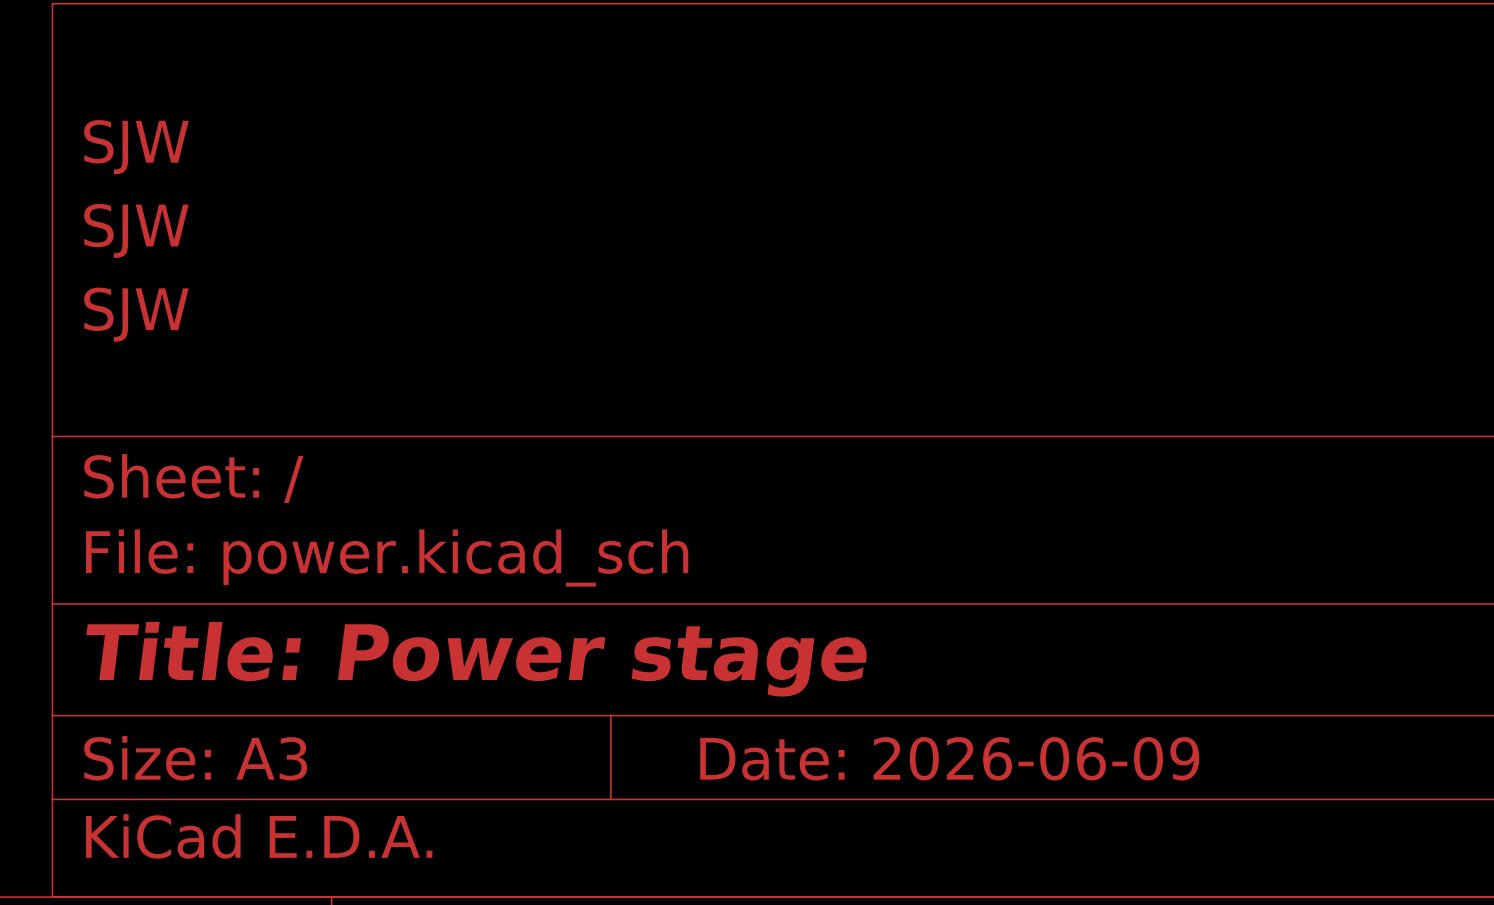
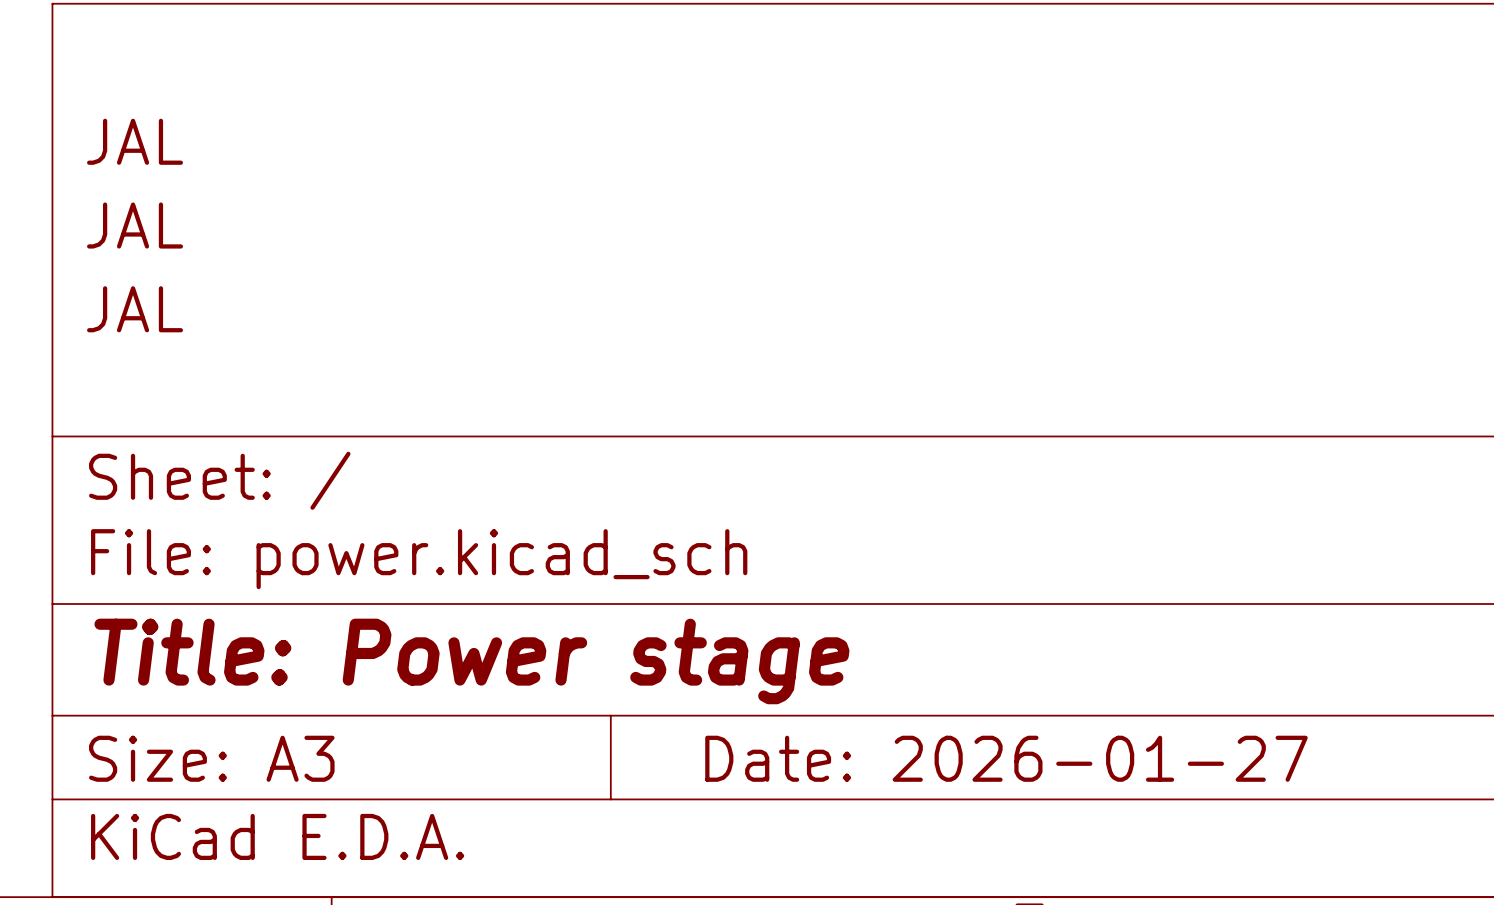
title block: SJW (136, 147) -> JAL (135, 141)
title block: SJW (136, 230) -> JAL (135, 225)
title block: SJW (136, 314) -> JAL (135, 309)
title block: Date: 2026-06-09 (949, 758) -> Date: 2026-01-27 (1006, 758)

